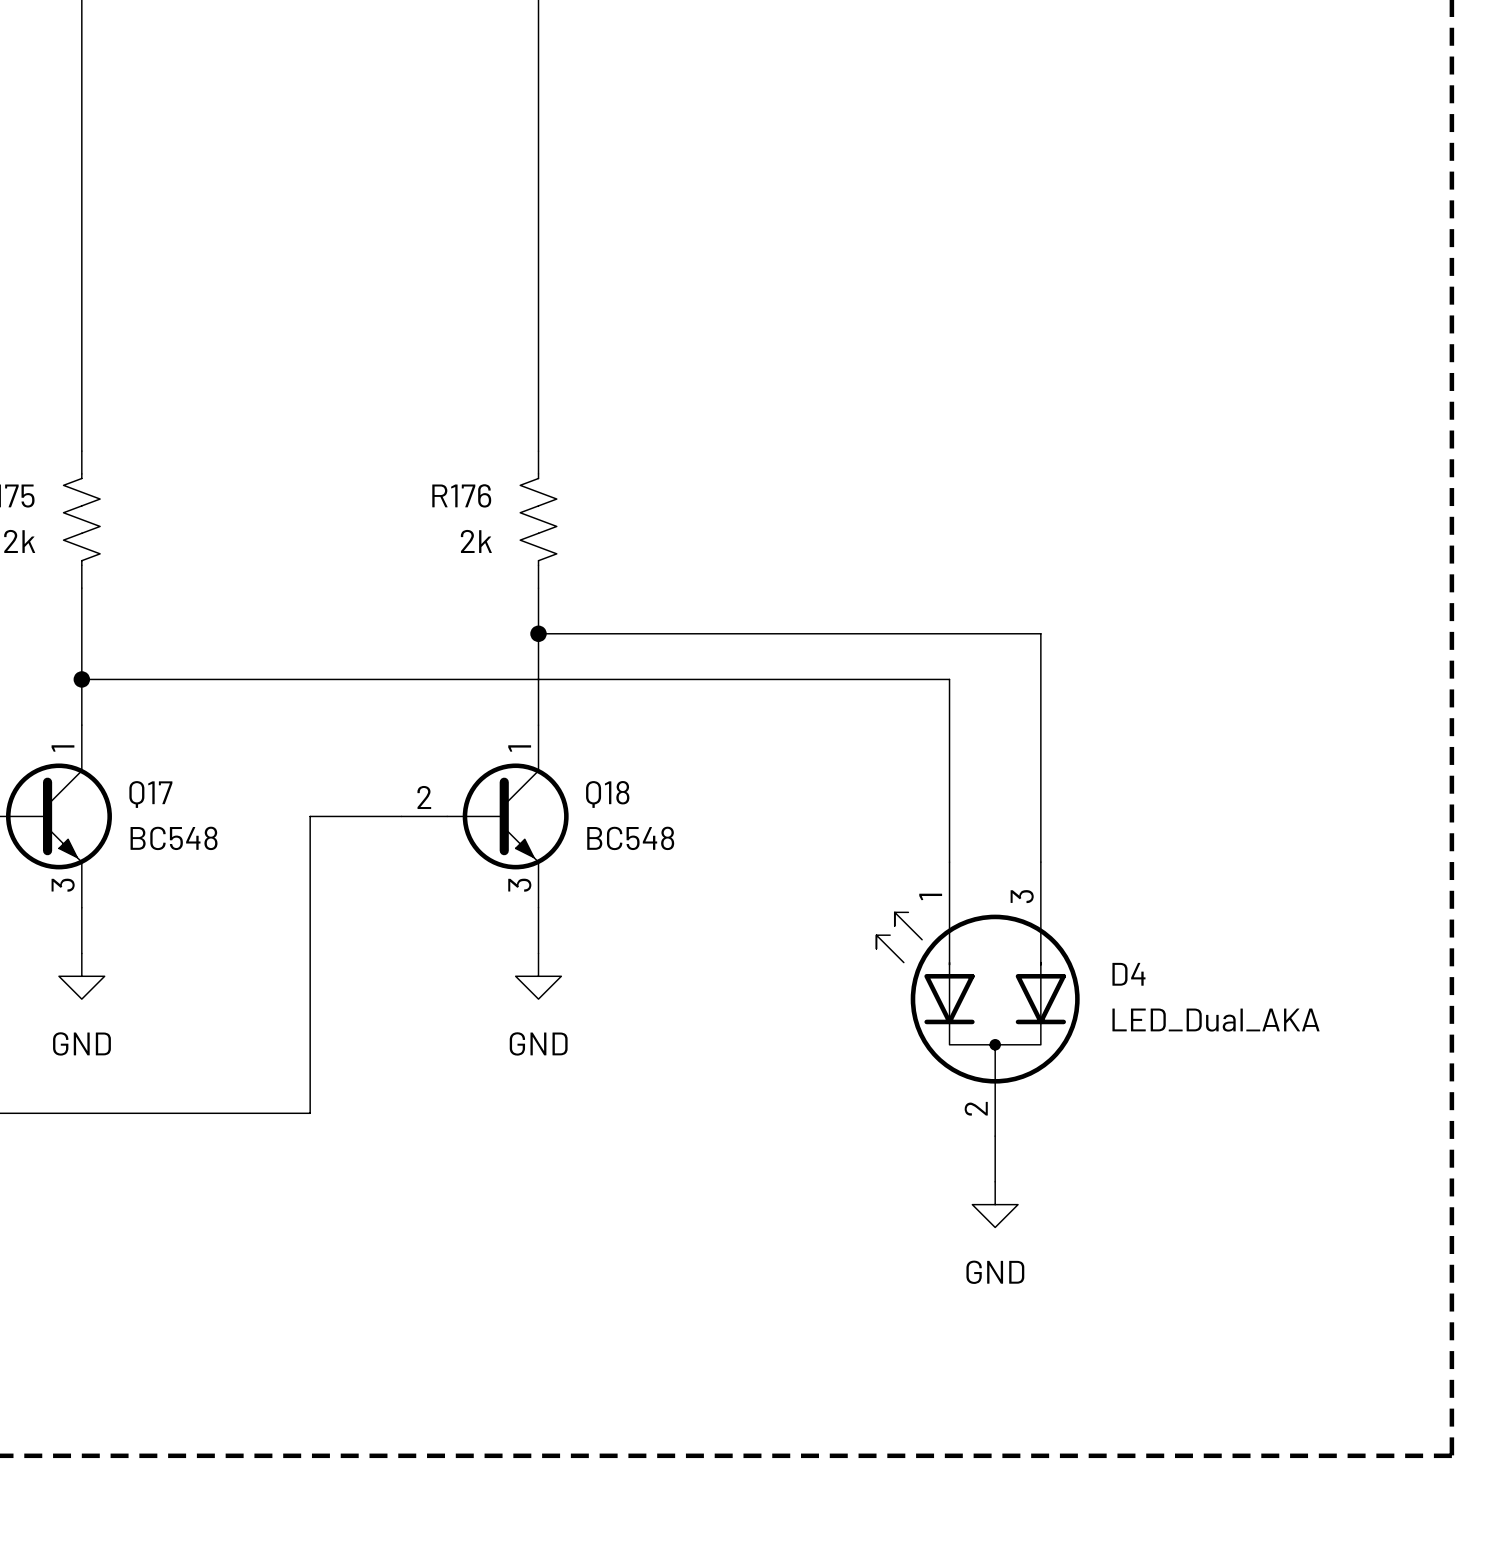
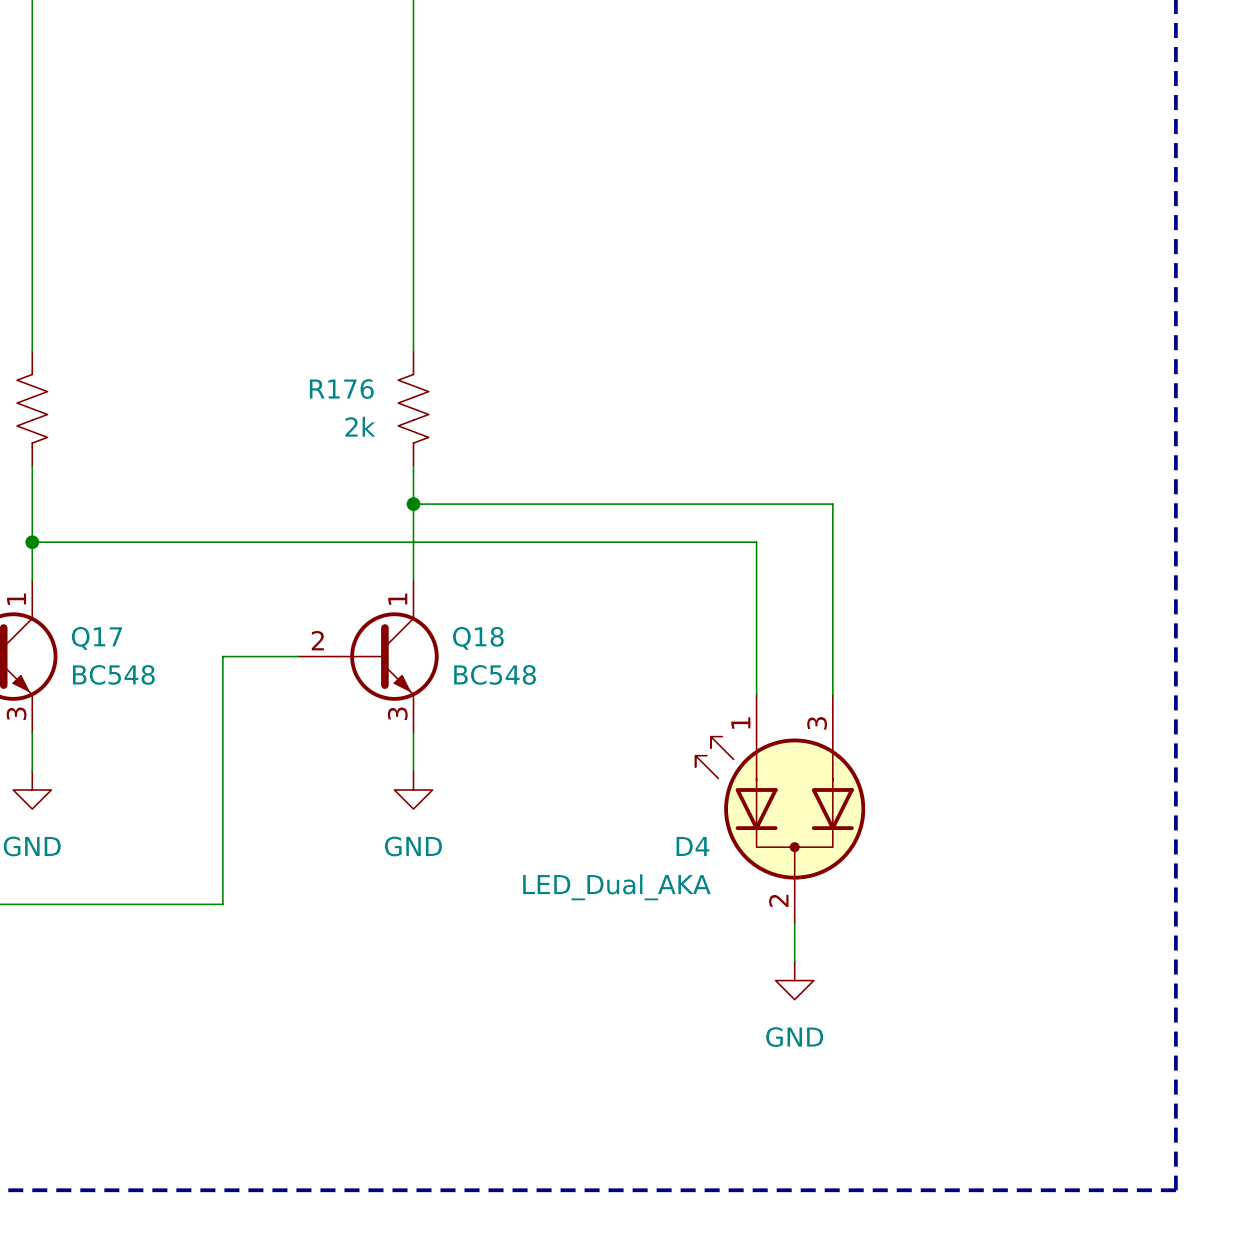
D4 name position: D4 (1128, 974) -> D4 (693, 846)
D4 value position: LED_Dual_AKA (1216, 1020) -> LED_Dual_AKA (616, 887)

